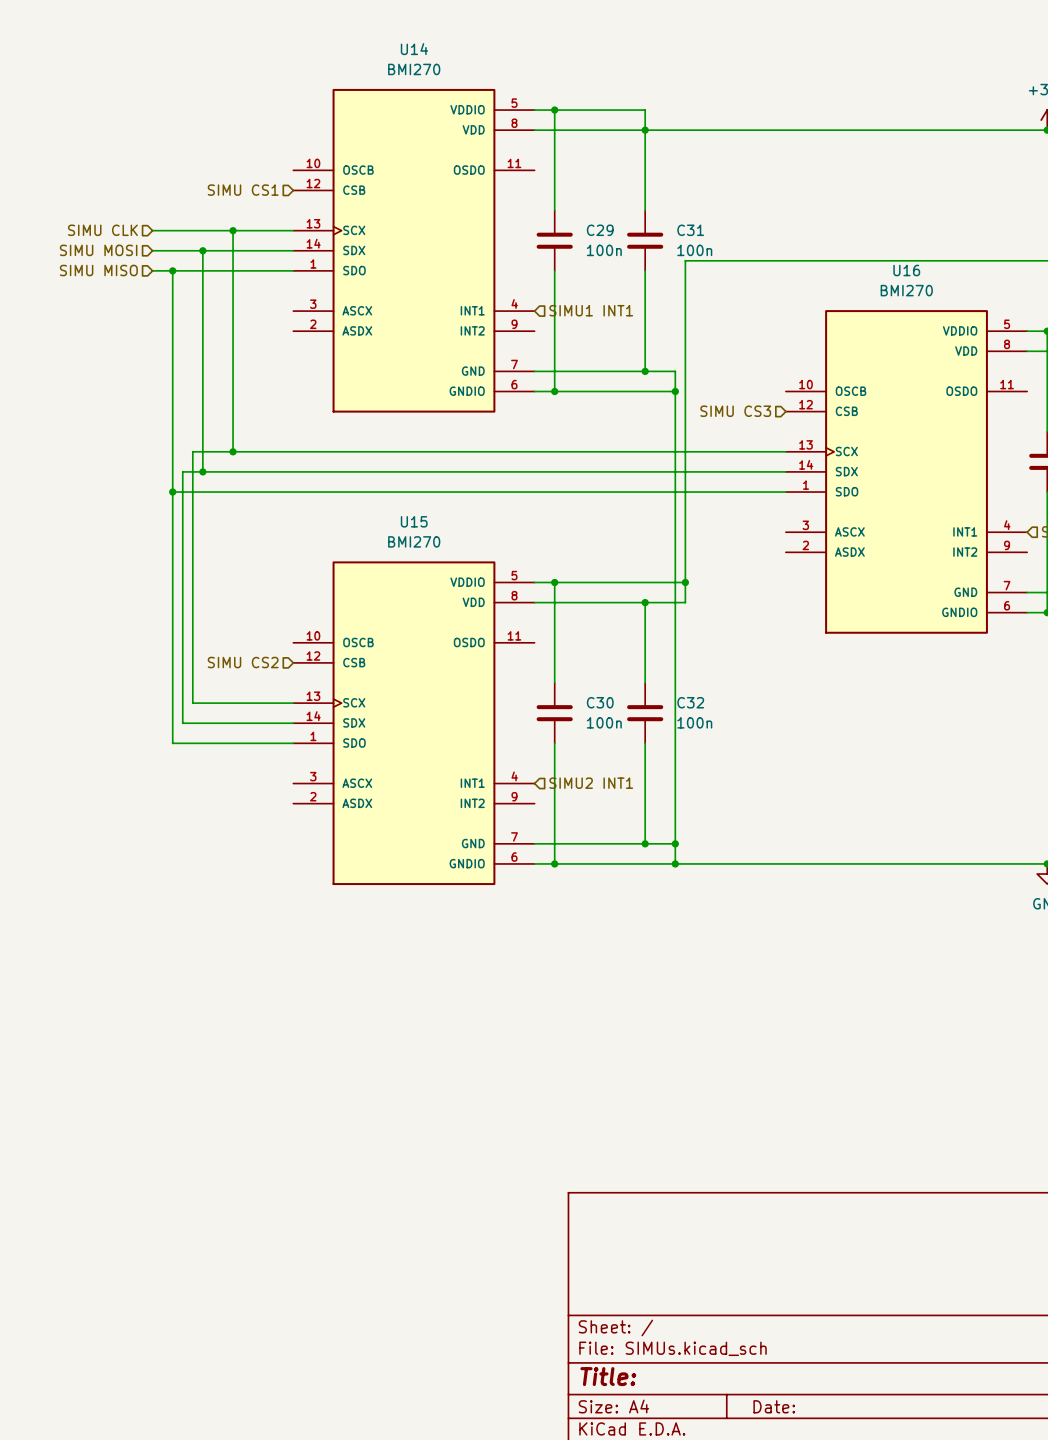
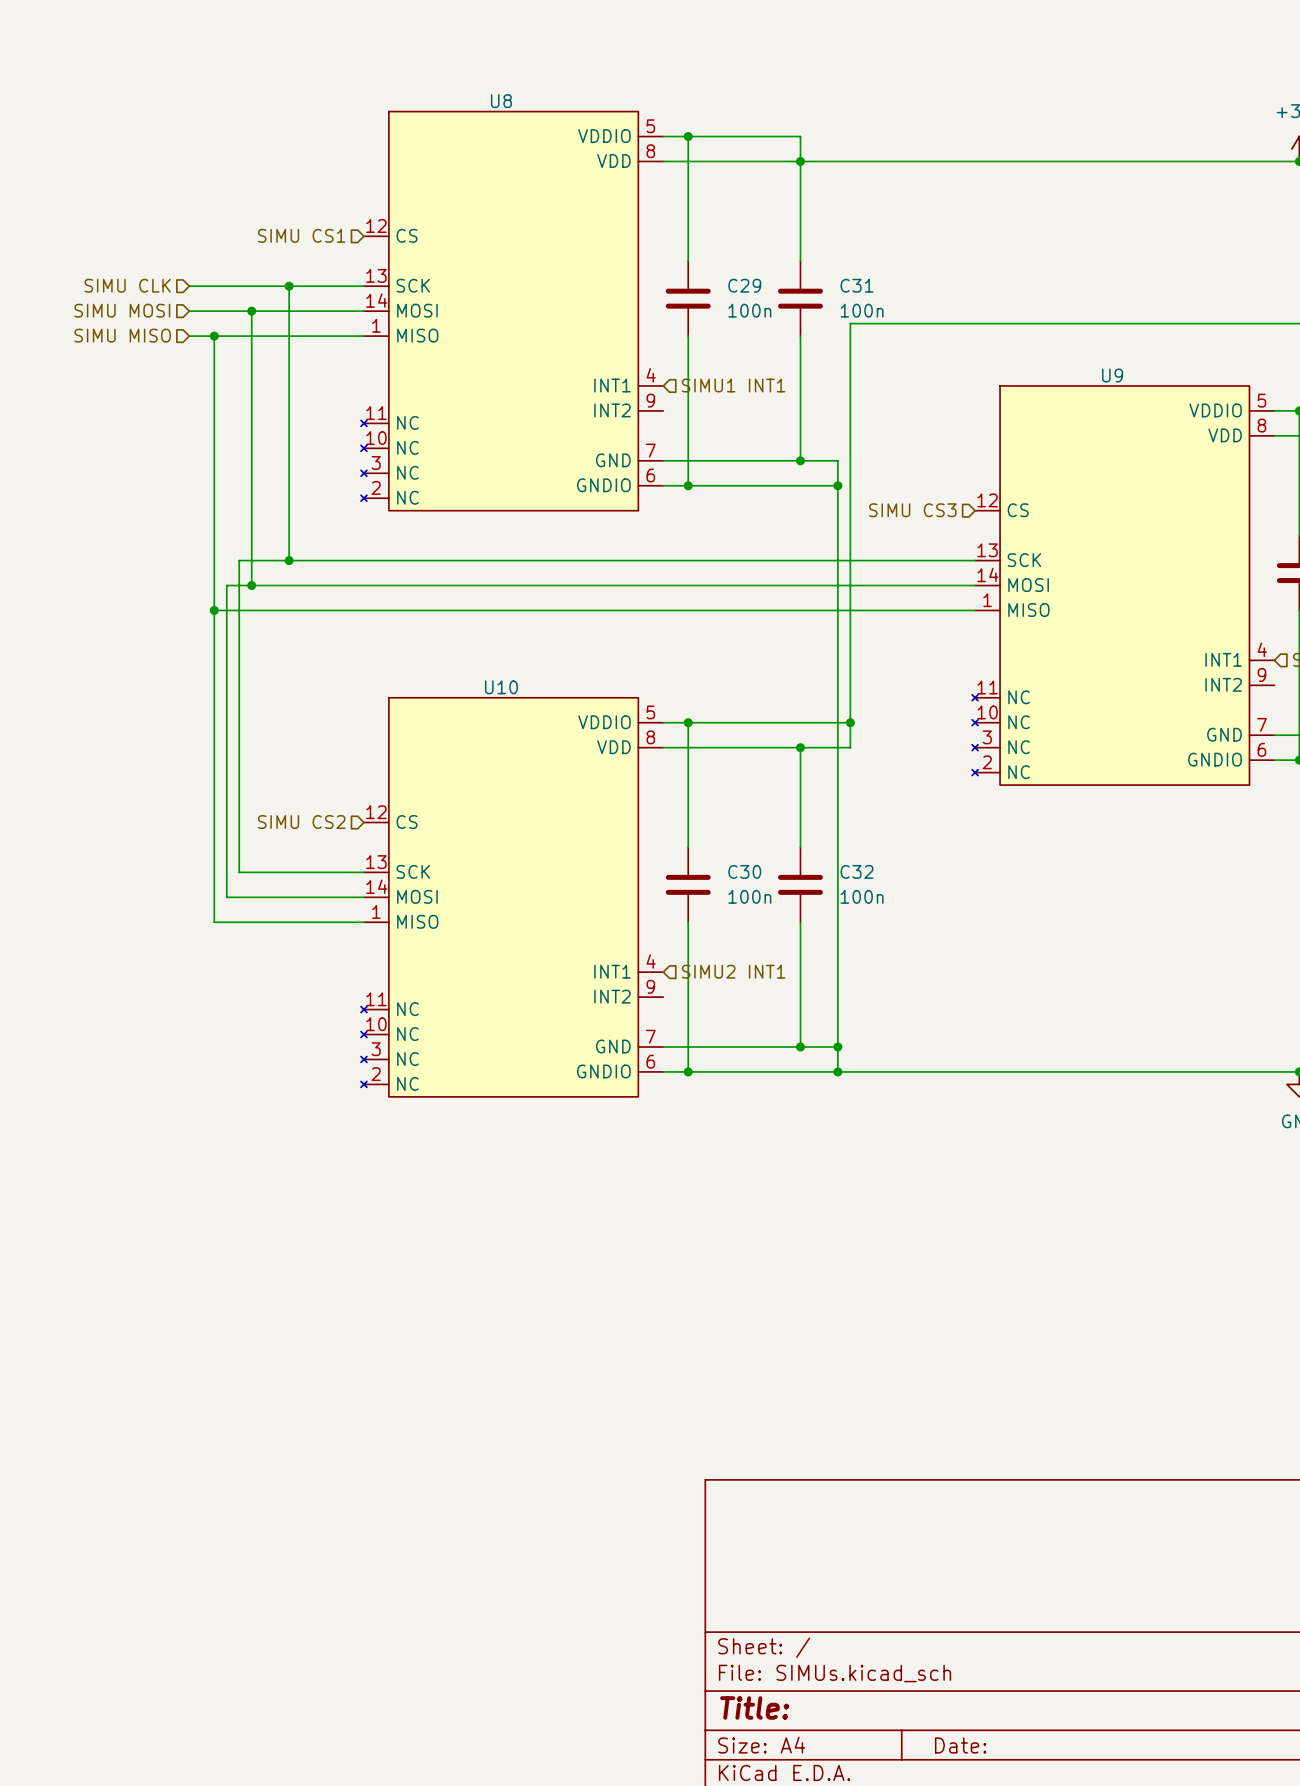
U8: none -> (512, 311)
U14: BMI270 (413, 250) -> none
U9: none -> (1123, 585)
U16: BMI270 (906, 471) -> none
U10: none -> (512, 897)
U15: BMI270 (413, 723) -> none

